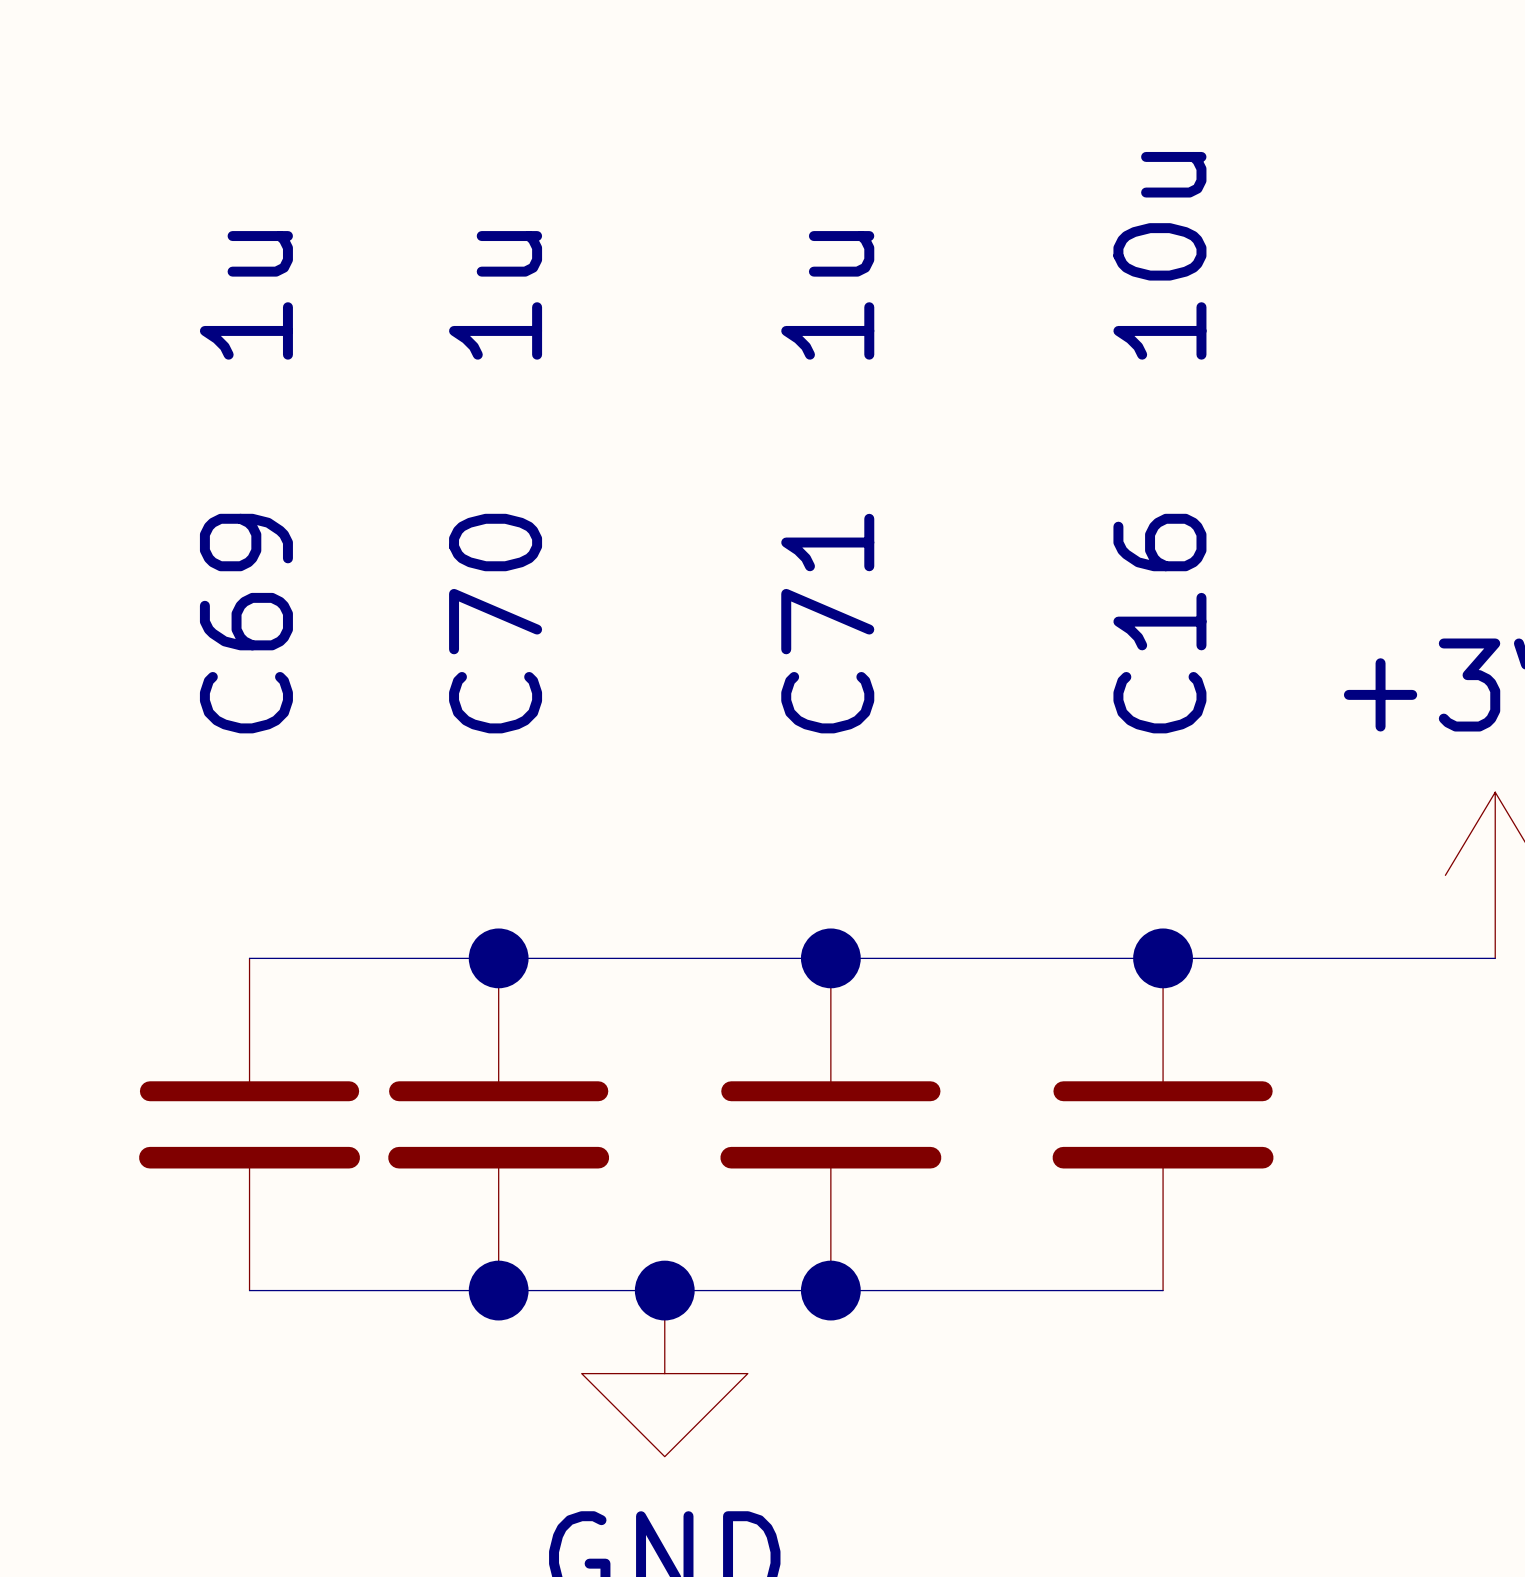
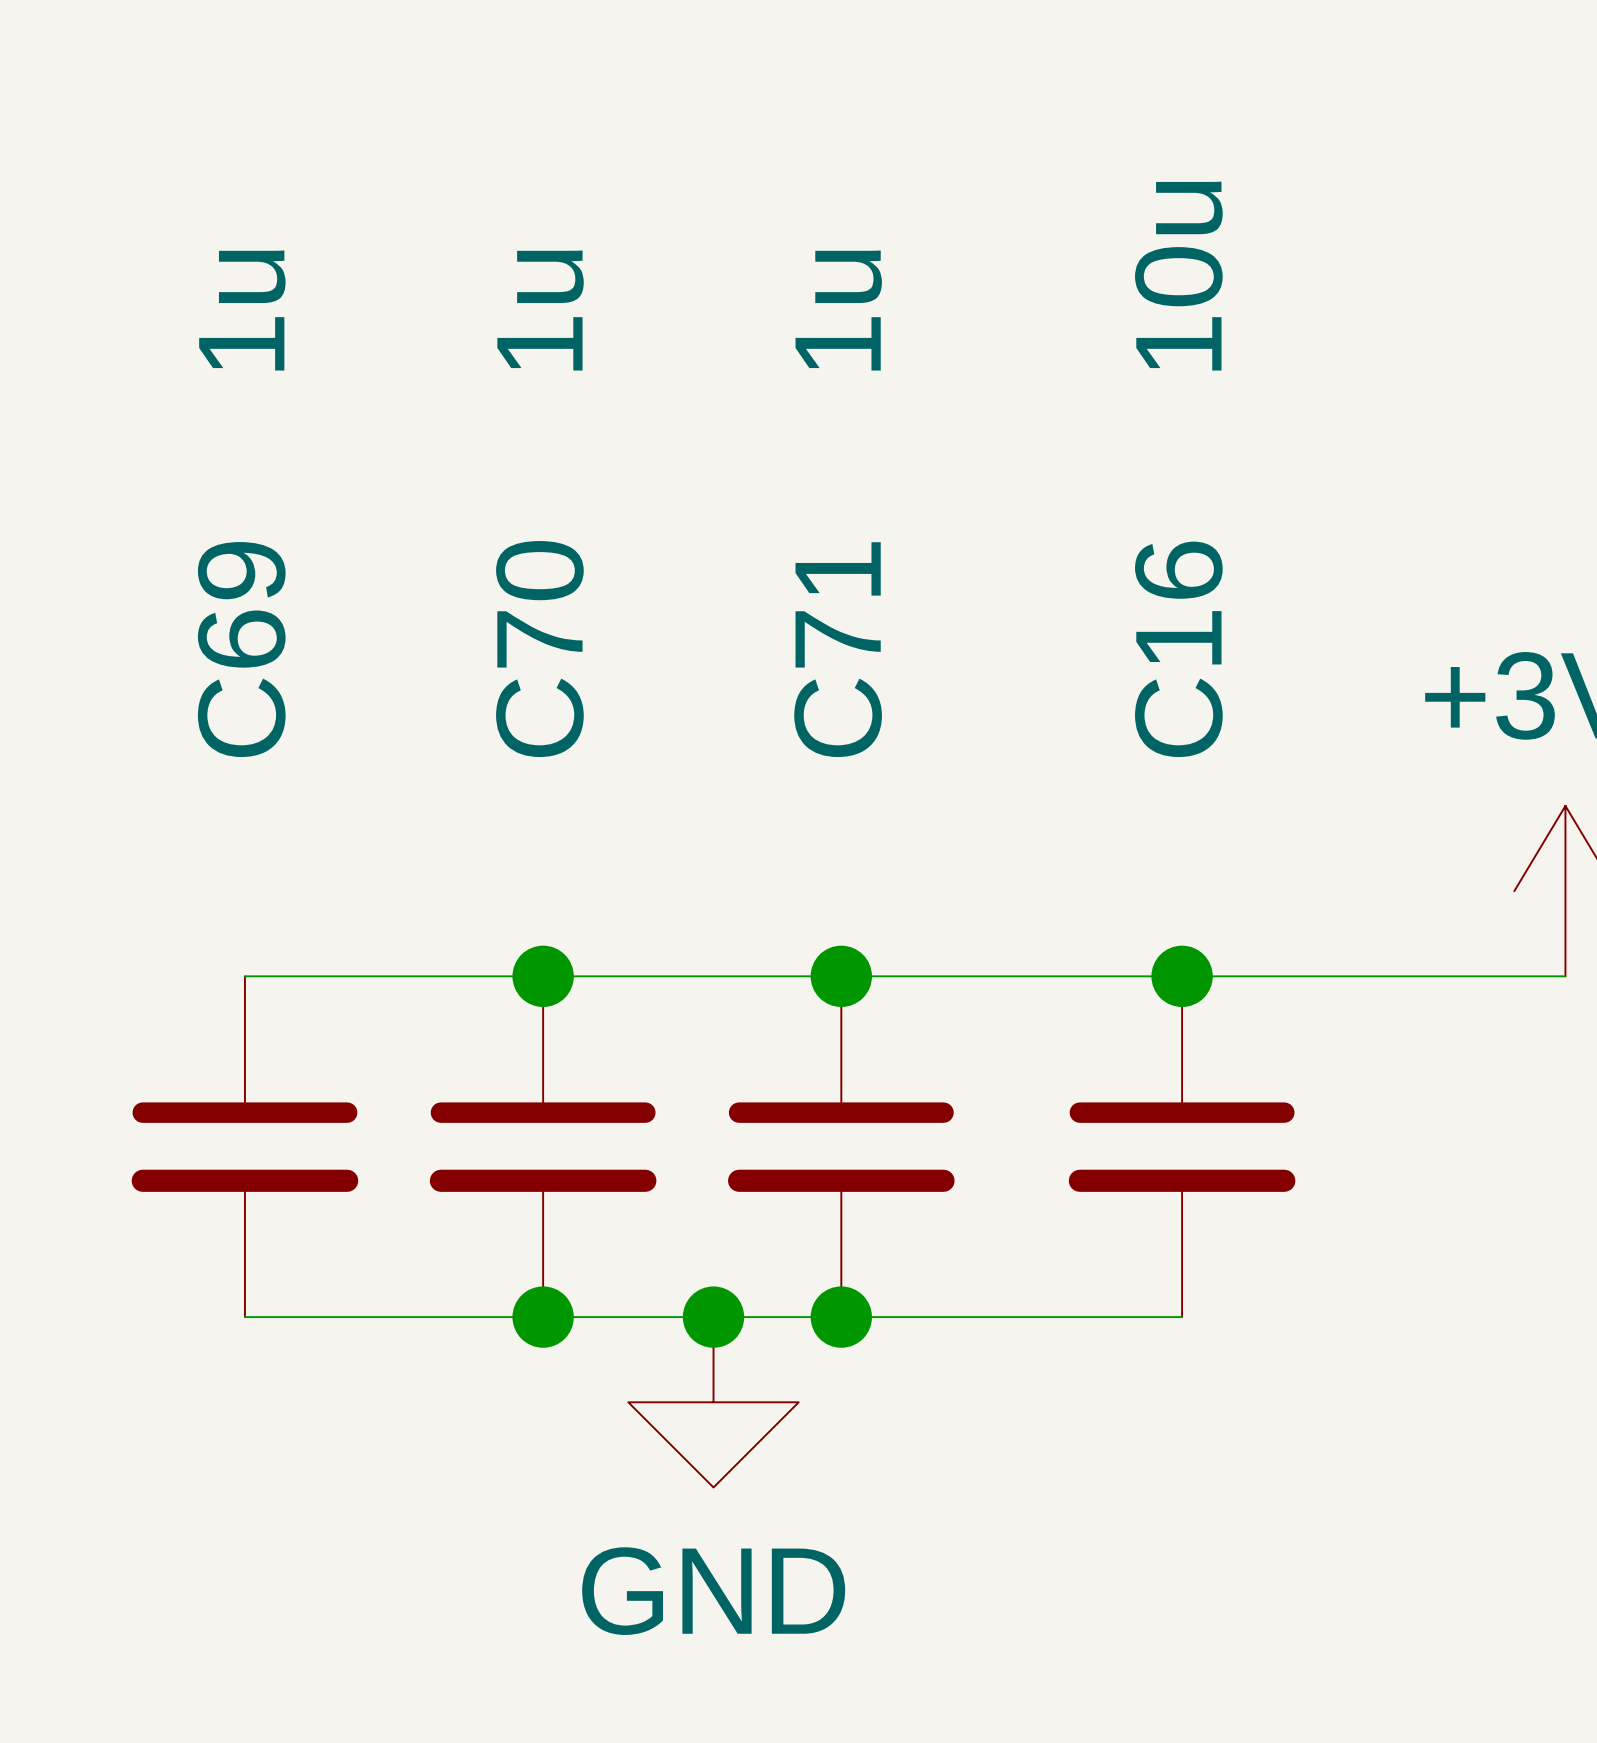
wire: none -> (244, 976) (287, 976)
junction position: (830, 958) -> (841, 976)
junction position: (1163, 958) -> (1182, 976)
C69 position: (249, 1124) -> (244, 1146)
C71 position: (830, 1124) -> (841, 1146)
C16 position: (1163, 1124) -> (1182, 1146)
junction position: (830, 1290) -> (841, 1317)
wire: (1121, 1290) (1163, 1290) -> (244, 1317) (287, 1317)

